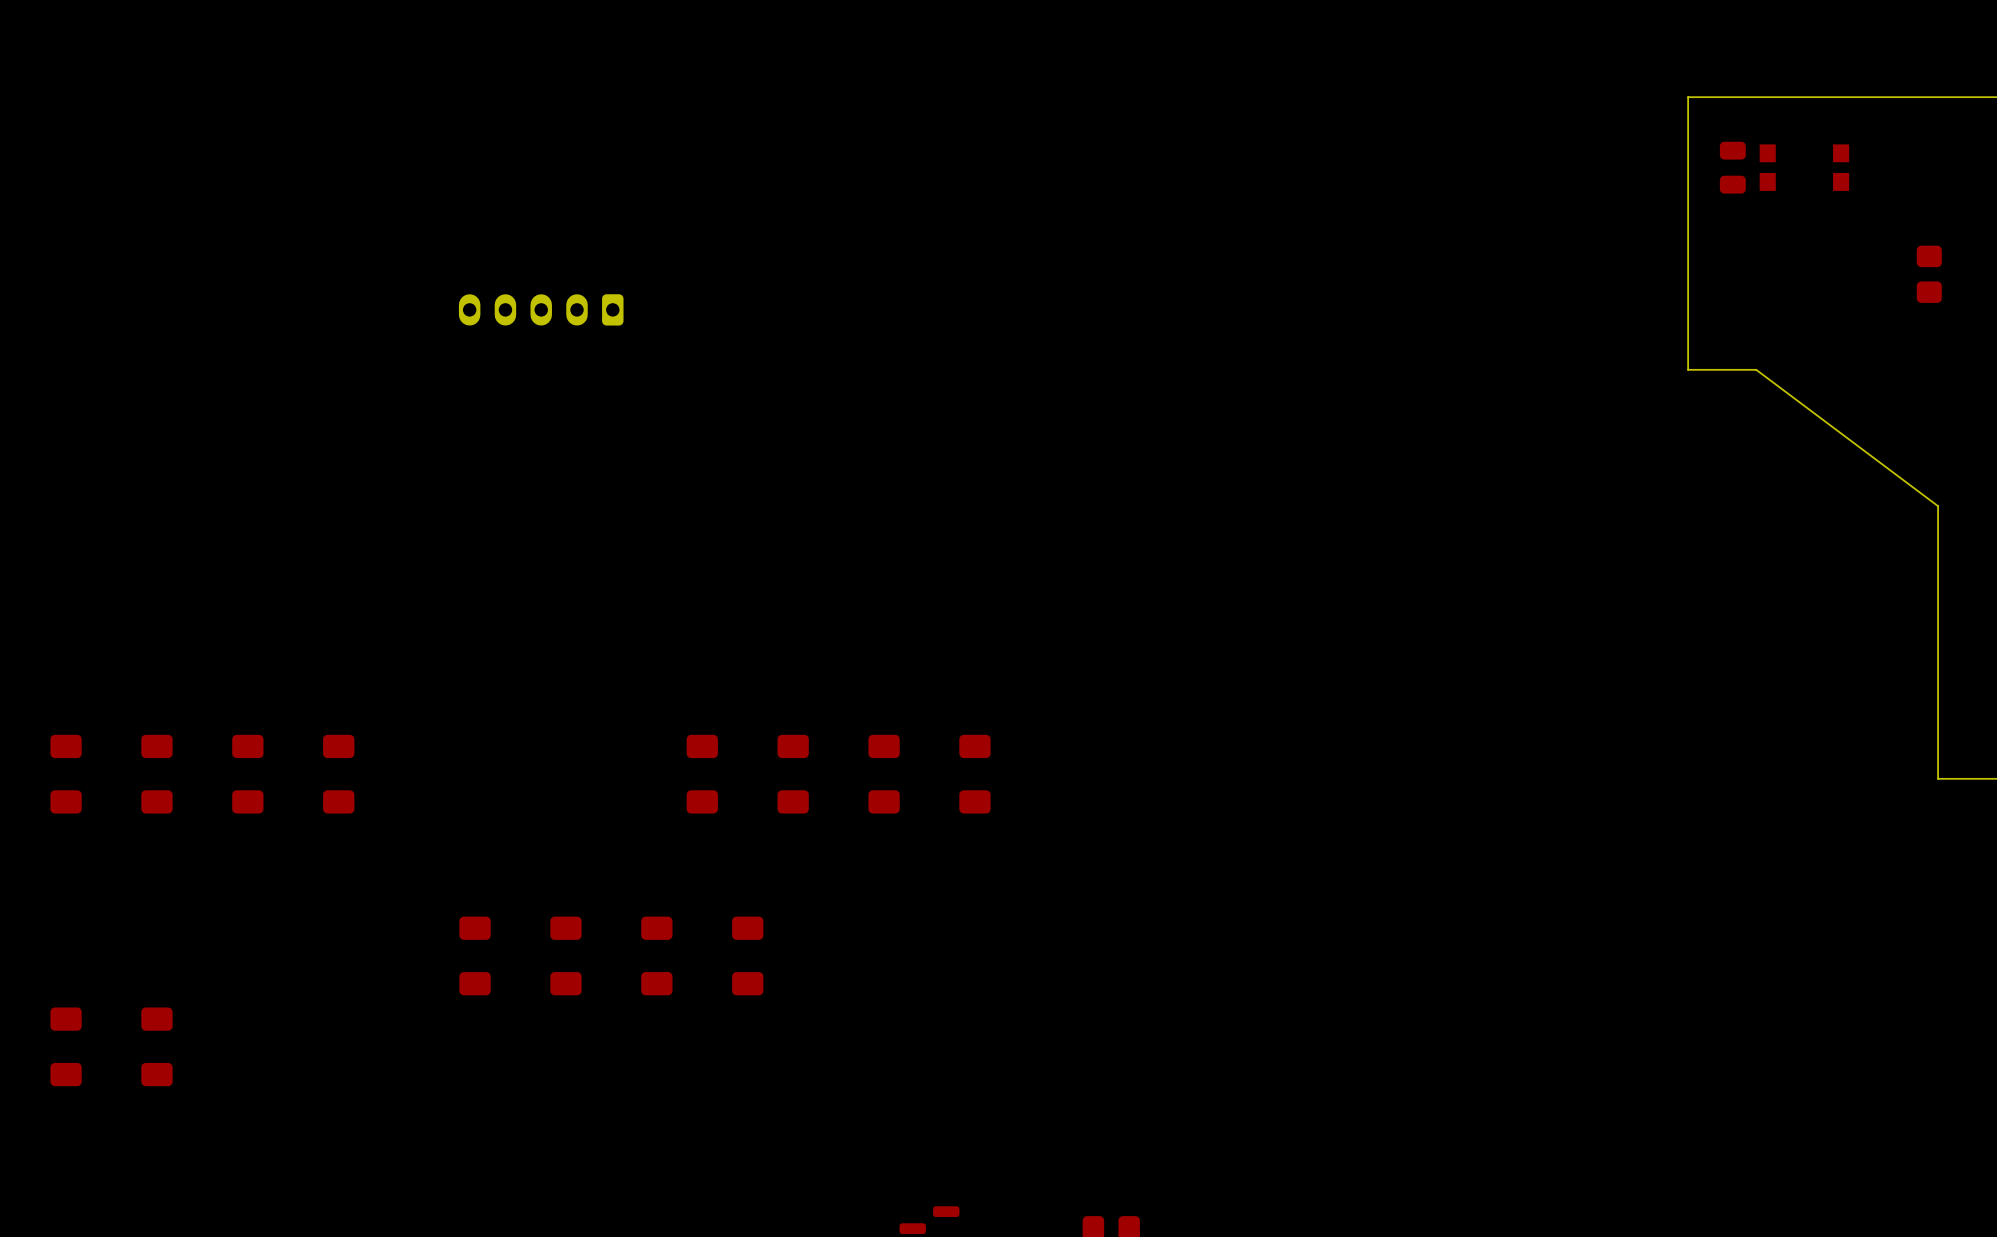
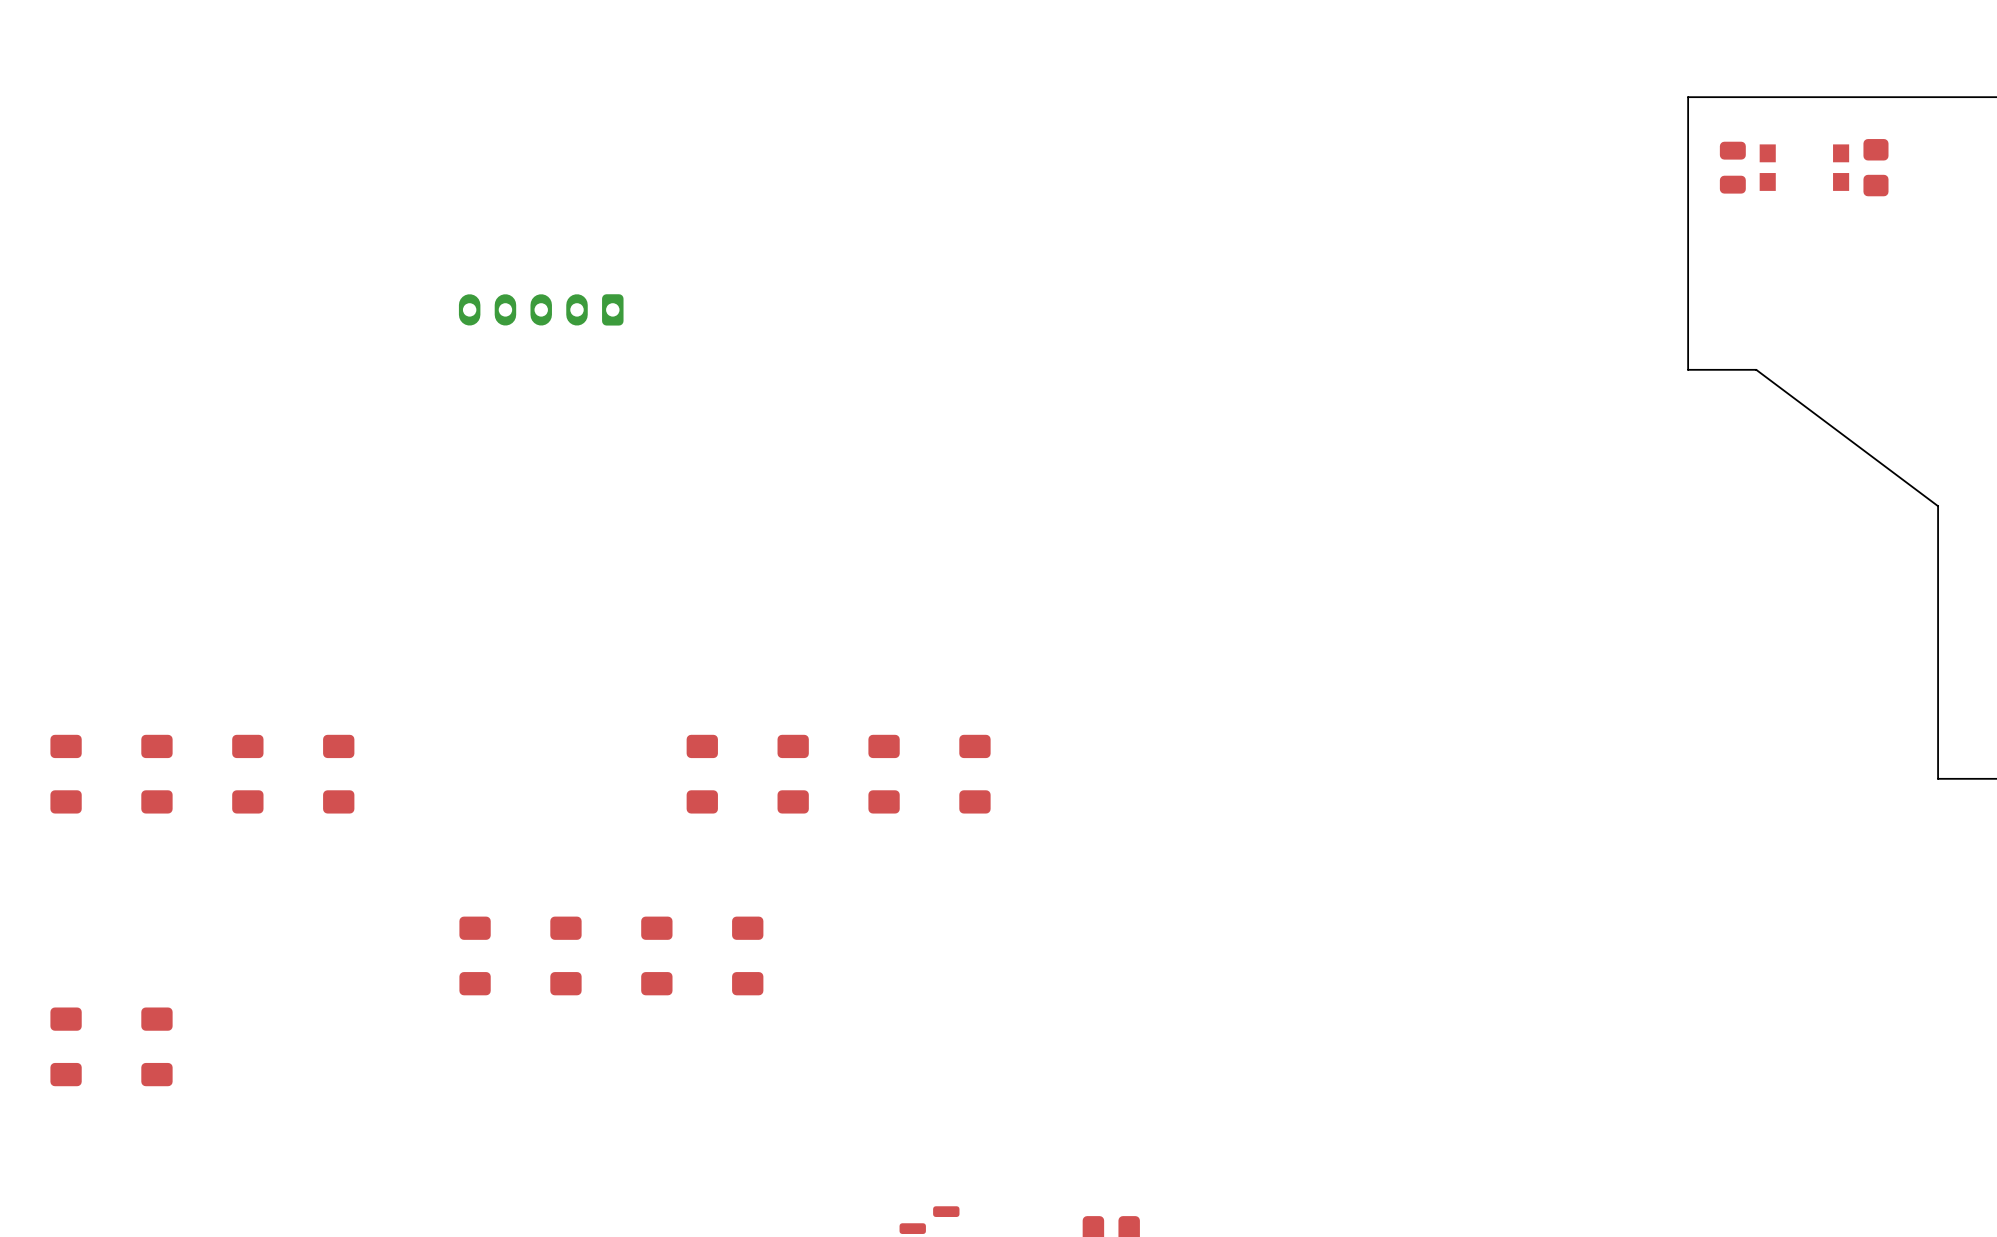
part position: (1929, 274) -> (1875, 167)

